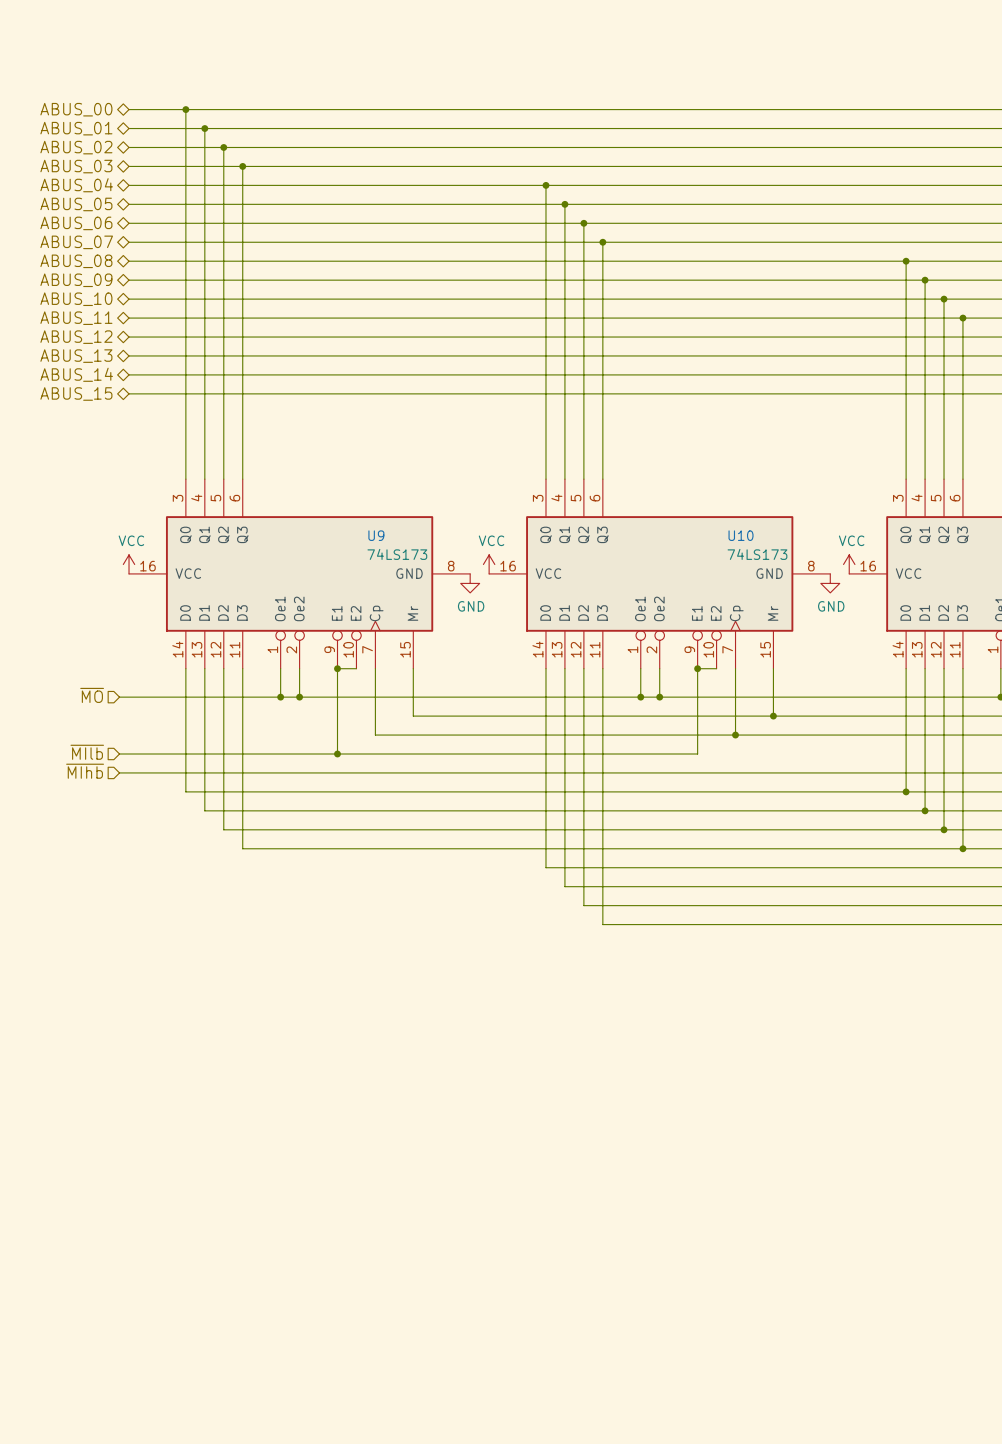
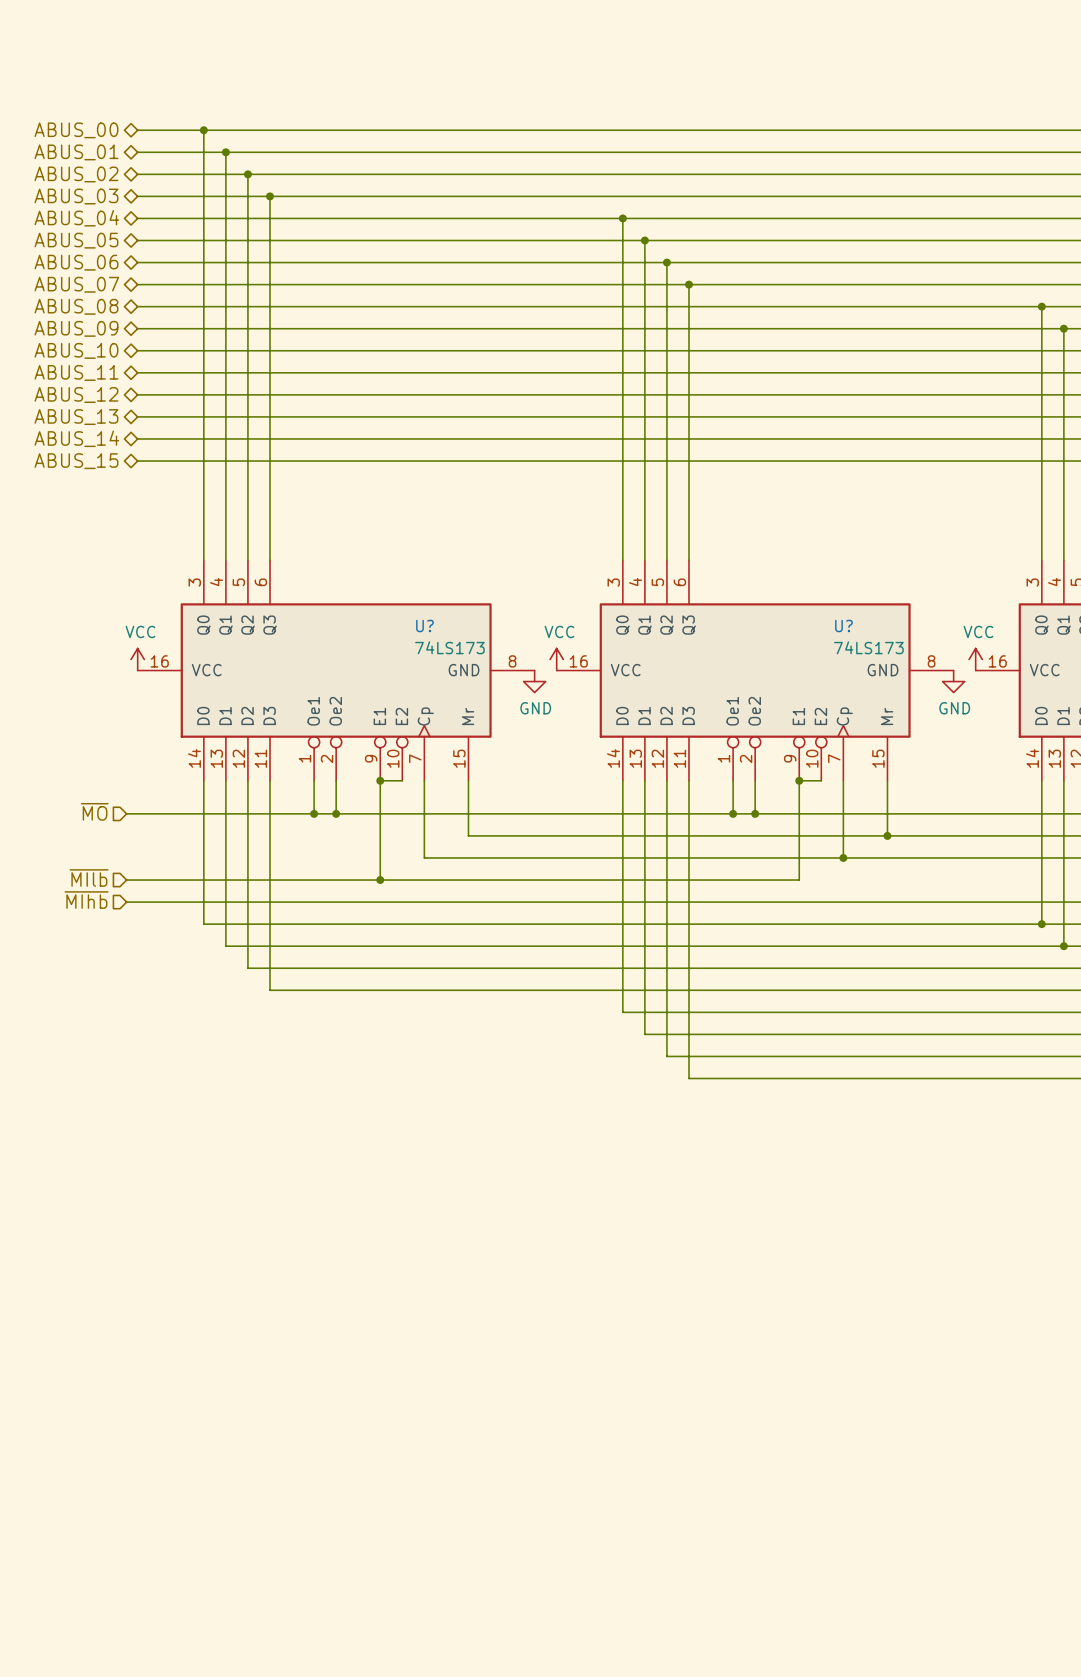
U9 name: U9 (376, 535) -> U? (424, 626)
U10 name: U10 (741, 535) -> U? (843, 626)

